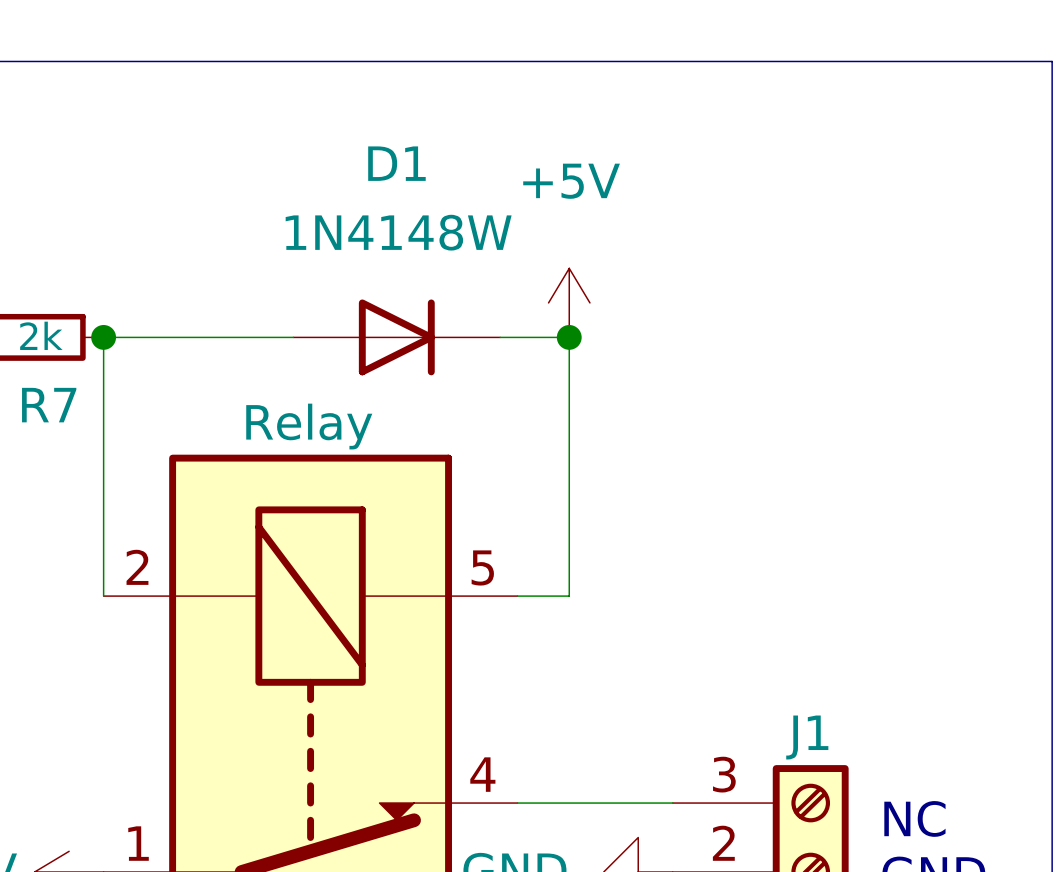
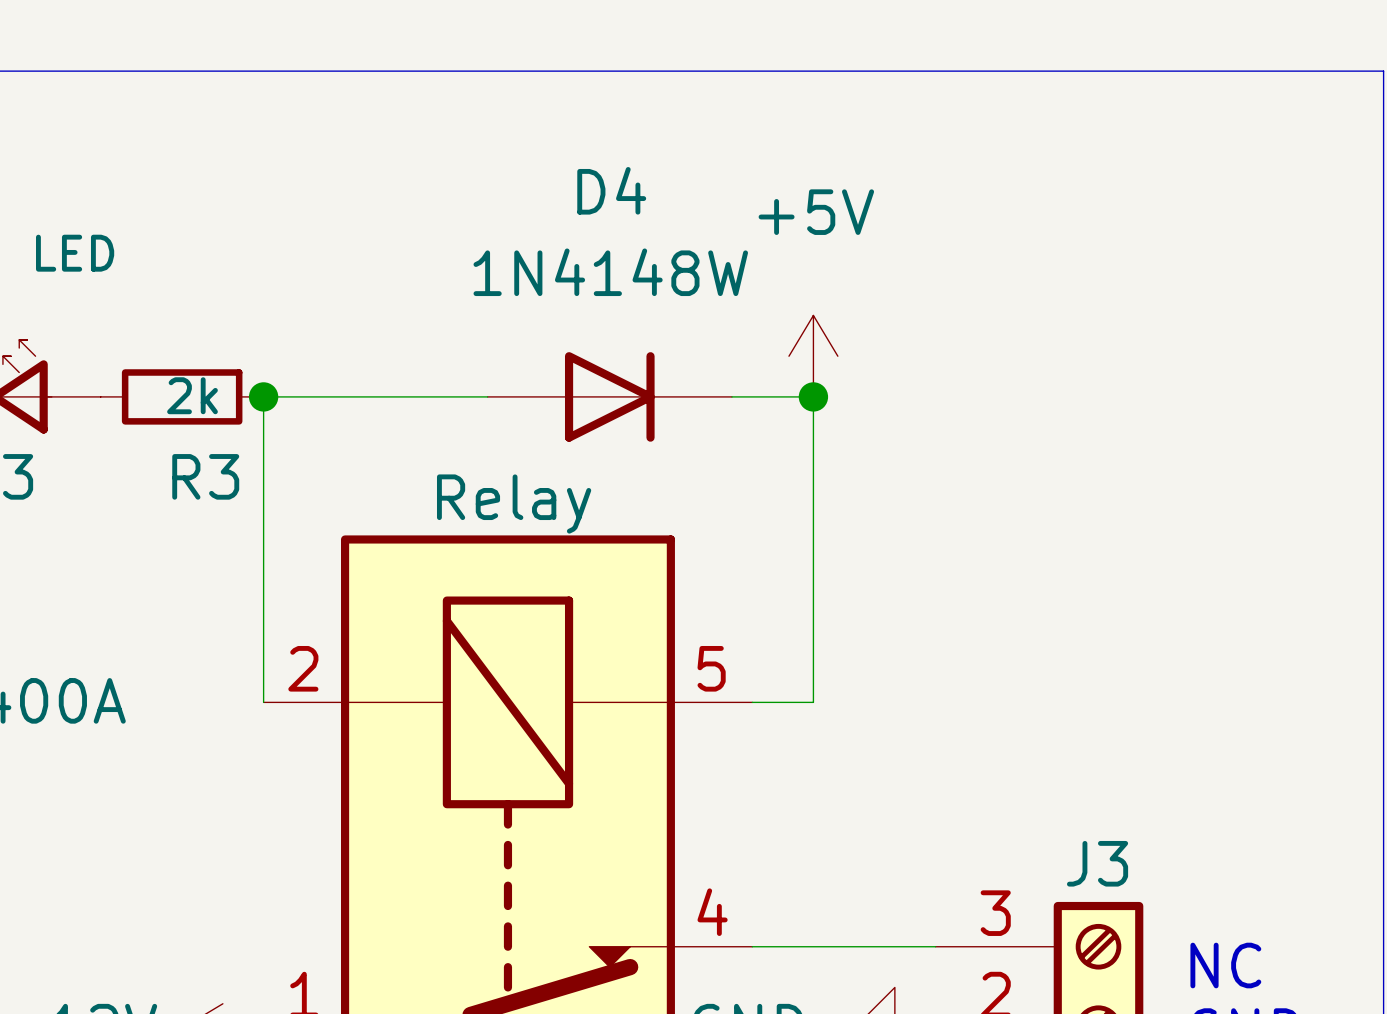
D1 name: D1 (396, 163) -> D4 (611, 190)
R7 name: R7 (49, 405) -> R3 (205, 476)
J1 name: J1 (807, 737) -> J3 (1097, 863)

